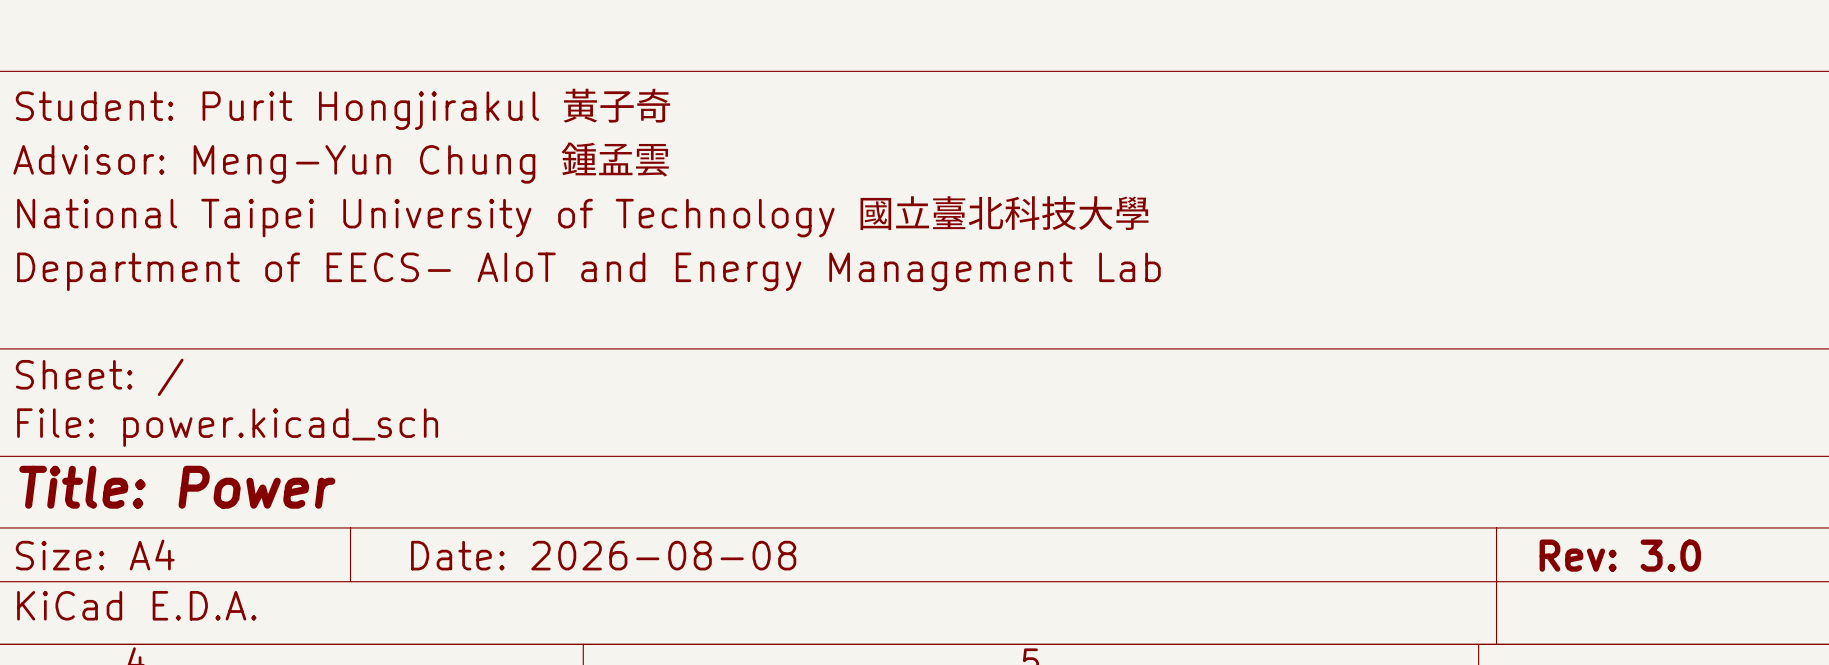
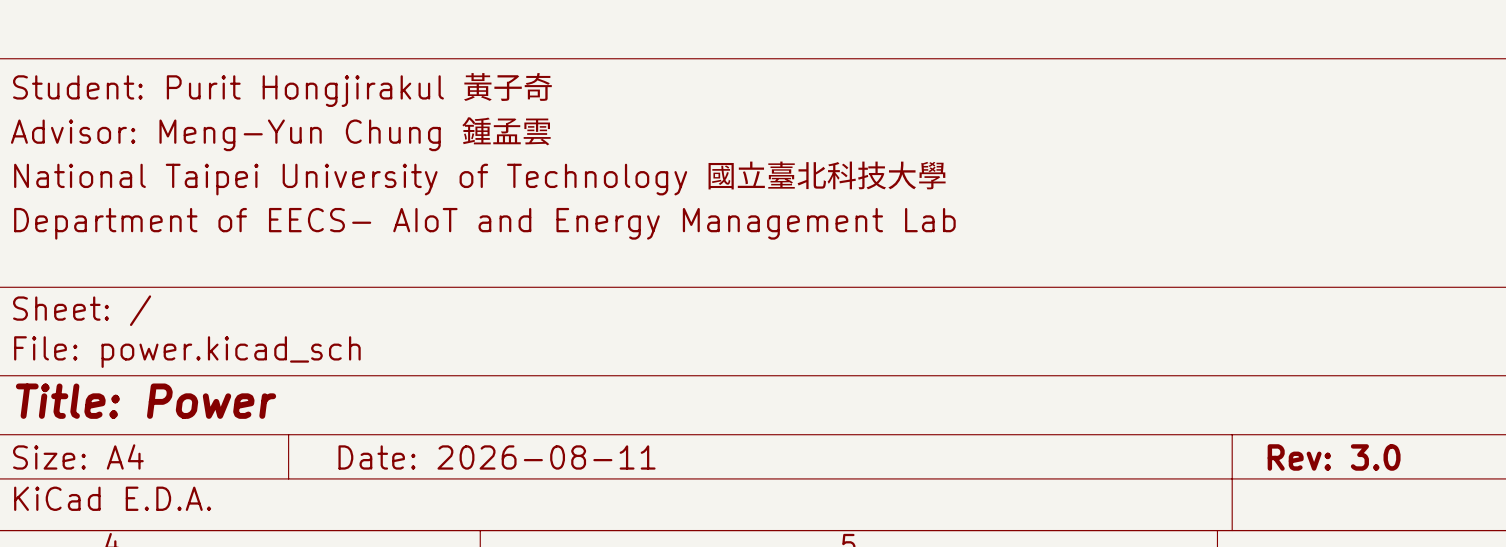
title block: Date: 2026-08-08 (603, 555) -> Date: 2026-08-11 (497, 457)

